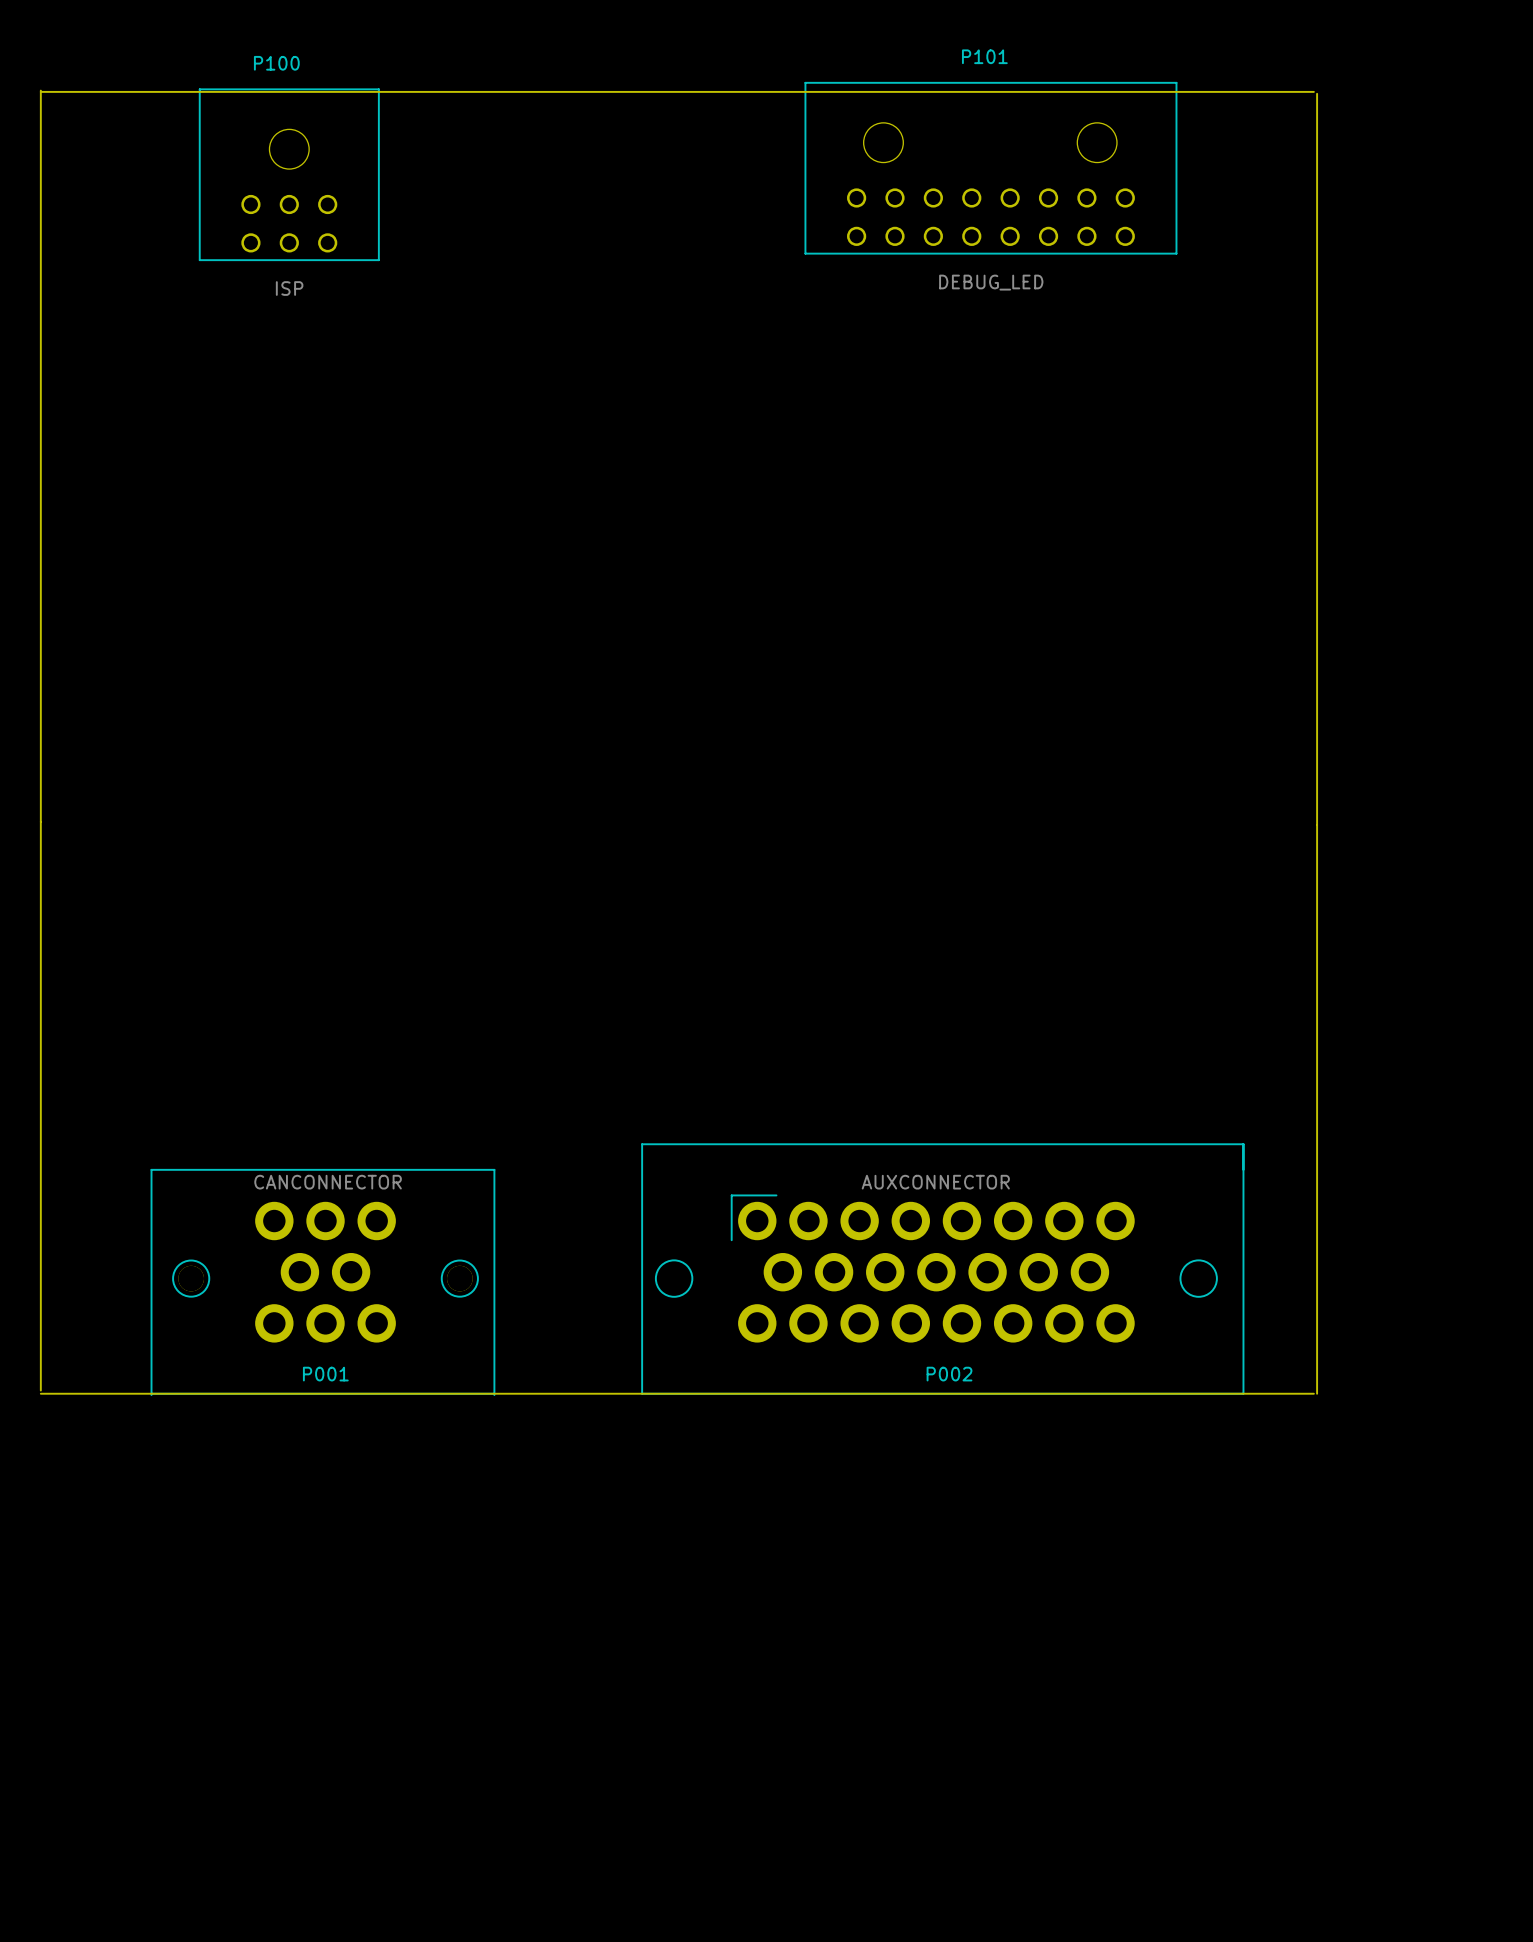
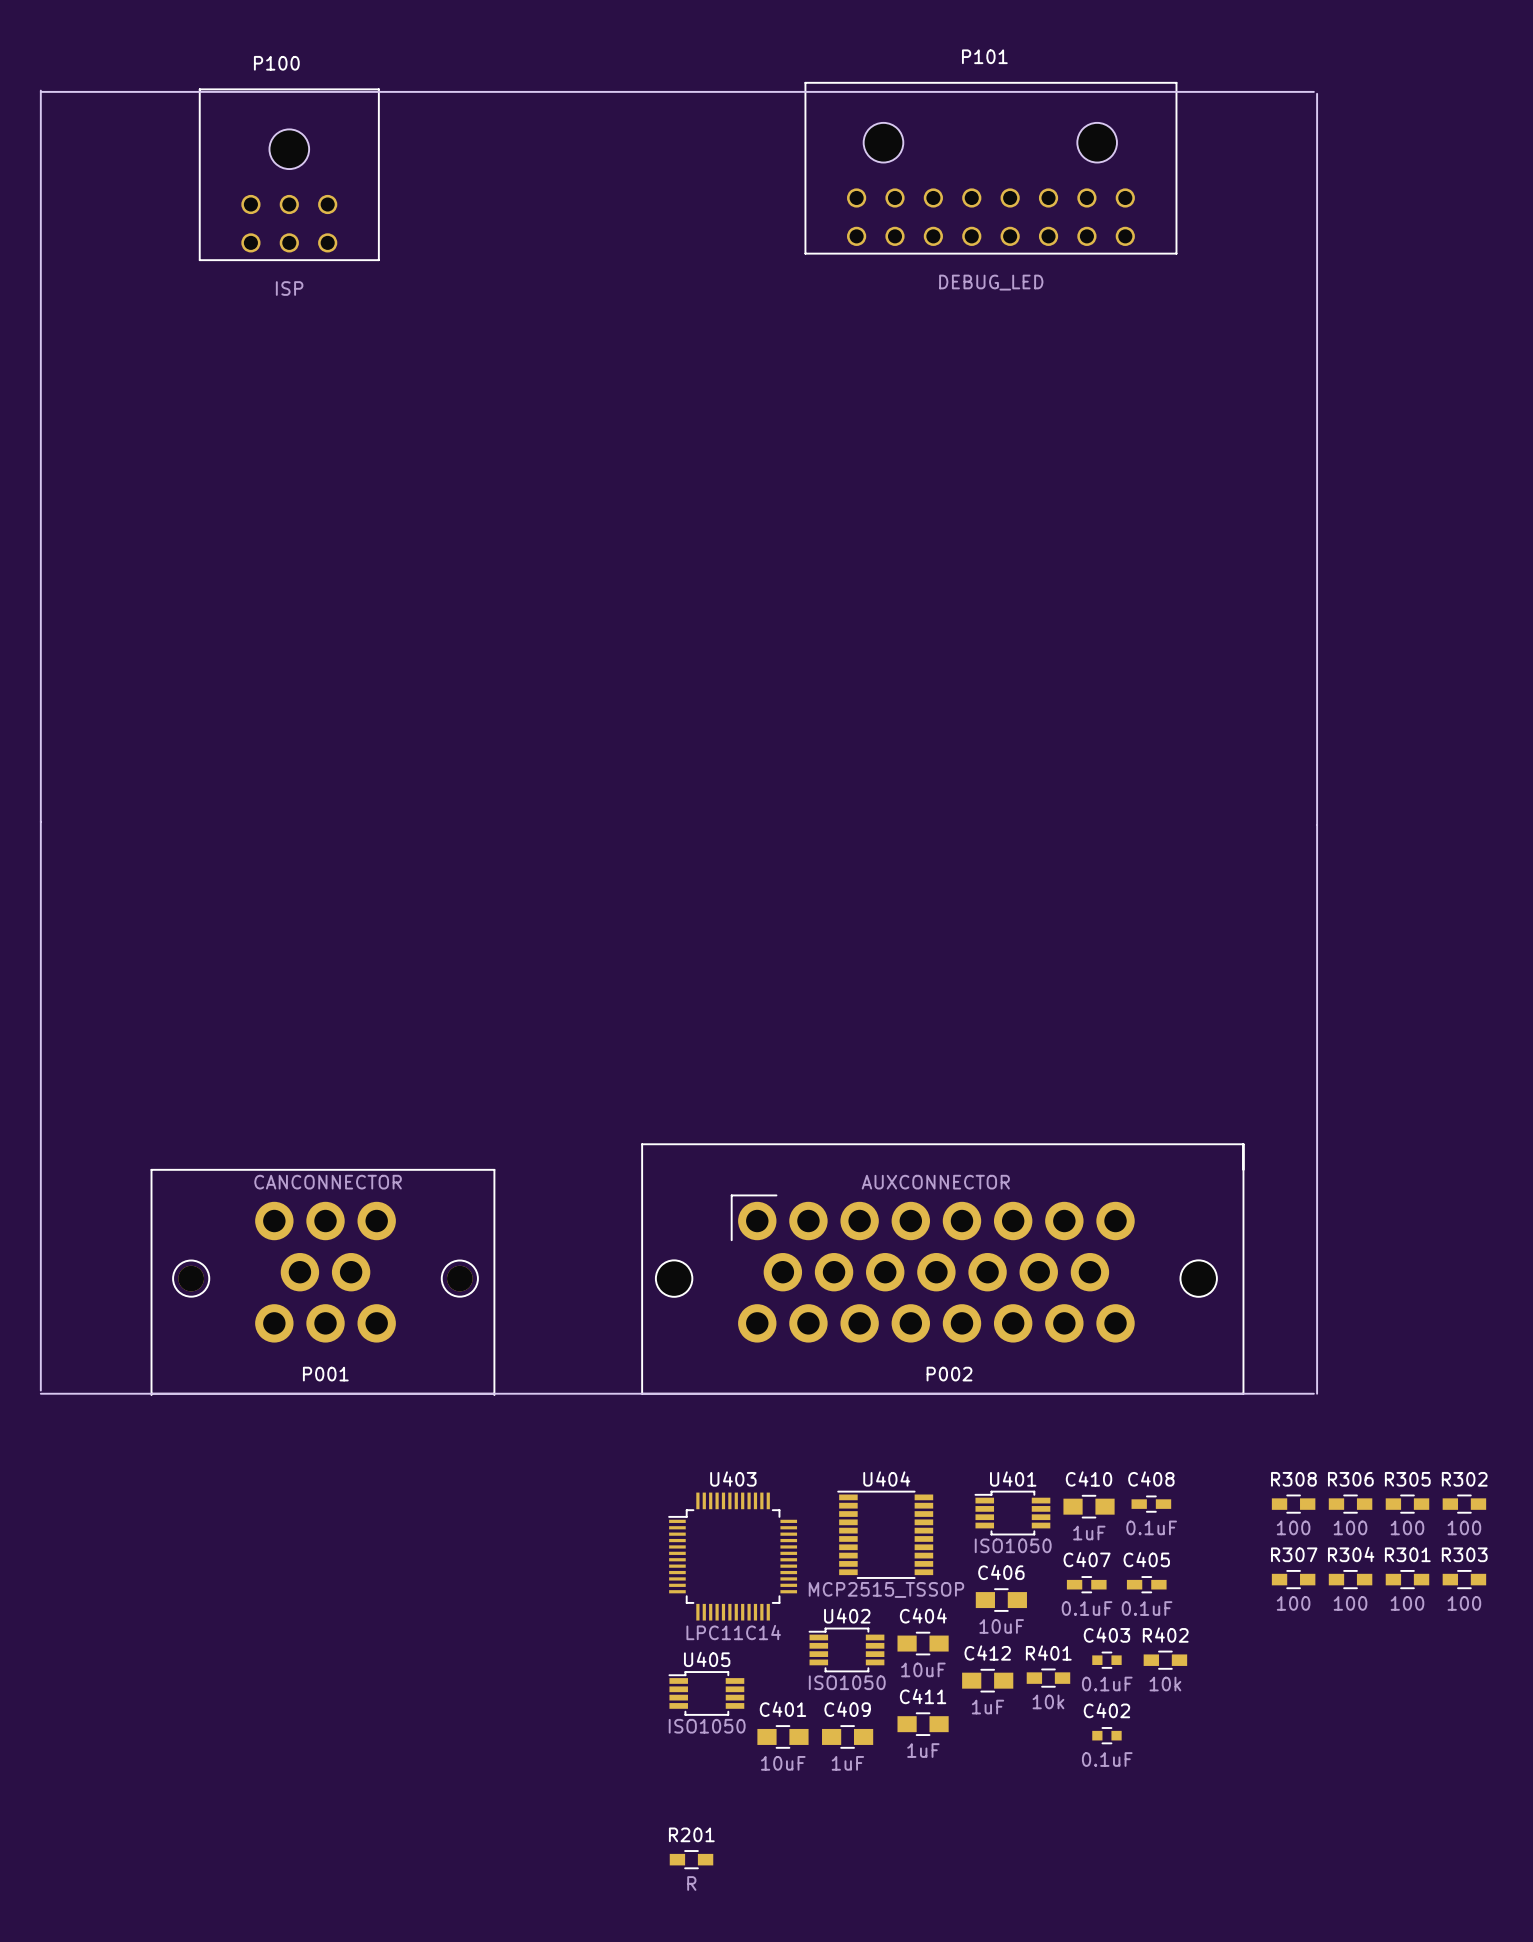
C408: none -> 0.1uF (1151, 1504)
R308: none -> 100 (1293, 1504)
R306: none -> 100 (1350, 1504)
R305: none -> 100 (1407, 1504)
R302: none -> 100 (1464, 1504)
C410: none -> 1uF (1089, 1506)
U401: none -> ISO1050 (1012, 1513)
U404: none -> MCP2515_TSSOP (885, 1534)
U403: none -> LPC11C14 (732, 1556)
R307: none -> 100 (1293, 1579)
R304: none -> 100 (1350, 1579)
R301: none -> 100 (1407, 1579)
R303: none -> 100 (1464, 1579)
C407: none -> 0.1uF (1086, 1584)
C405: none -> 0.1uF (1146, 1584)
C406: none -> 10uF (1001, 1600)
C404: none -> 10uF (923, 1643)
U402: none -> ISO1050 (846, 1649)
C403: none -> 0.1uF (1106, 1660)
R402: none -> 10k (1165, 1660)
R401: none -> 10k (1048, 1678)
C412: none -> 1uF (987, 1680)
U405: none -> ISO1050 (706, 1693)
C411: none -> 1uF (923, 1724)
C402: none -> 0.1uF (1106, 1735)
C401: none -> 10uF (782, 1736)
C409: none -> 1uF (847, 1736)
R201: none -> R (691, 1859)

